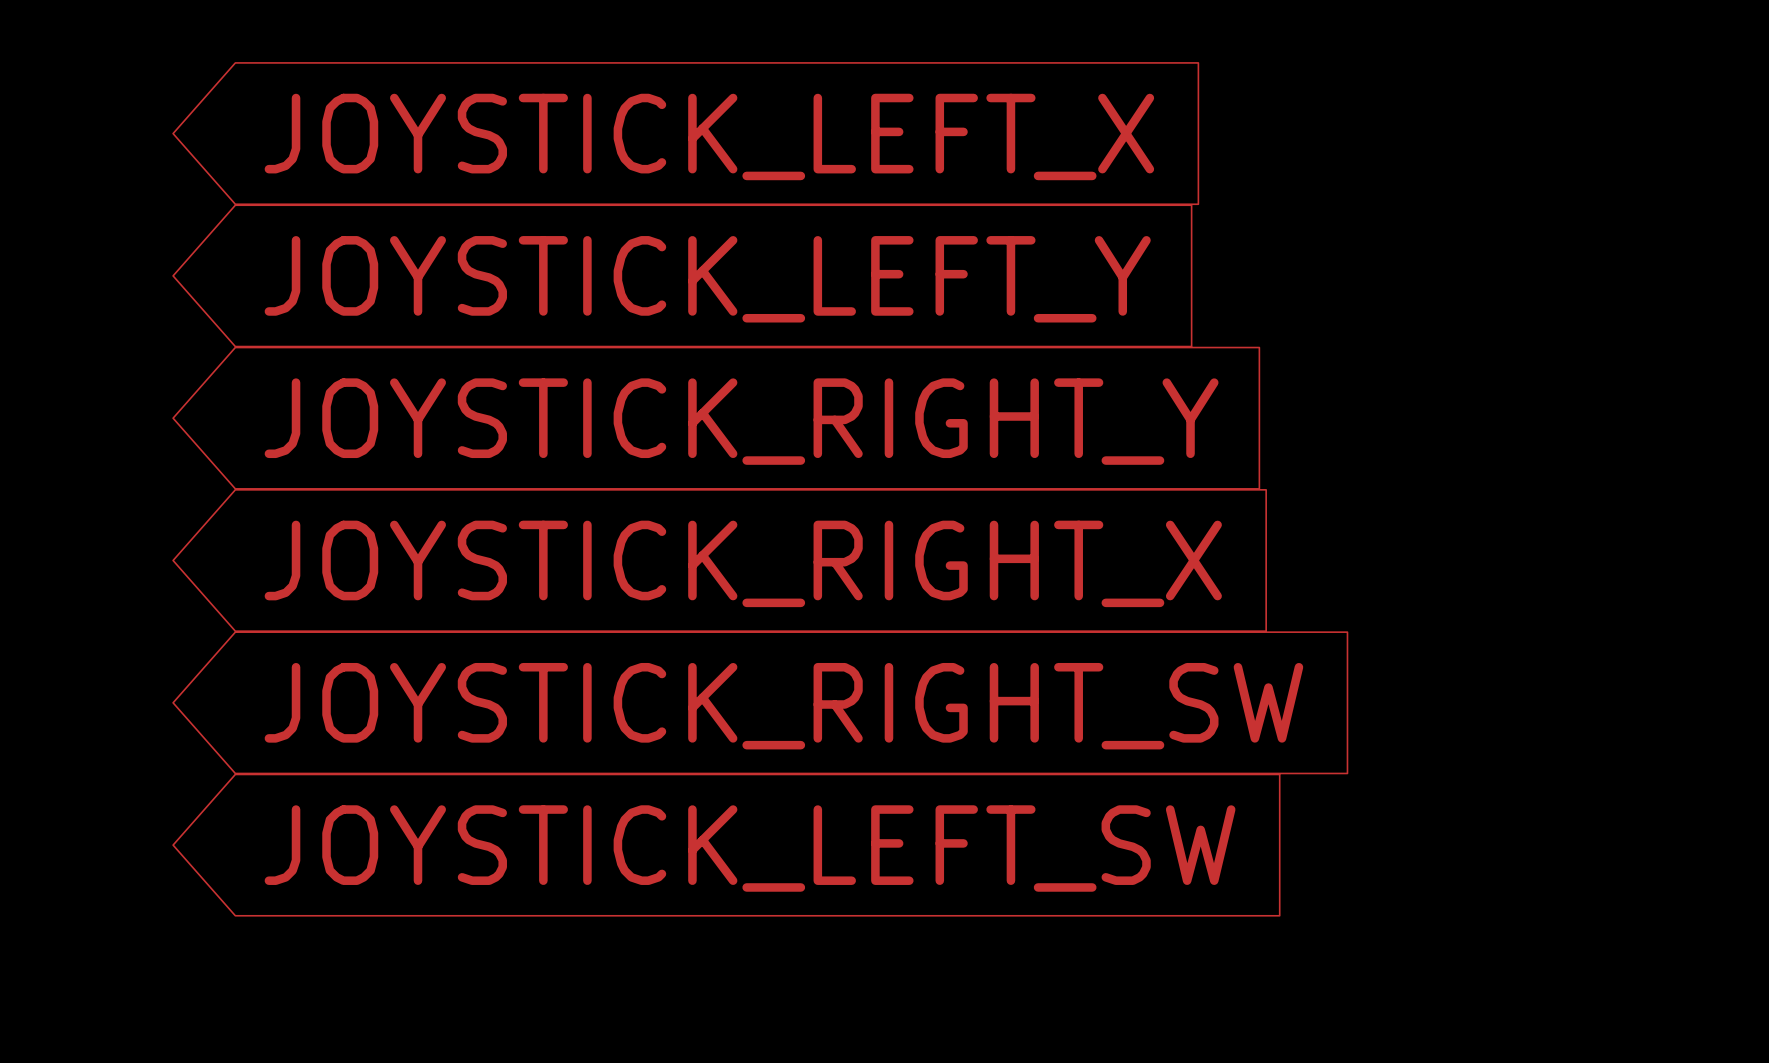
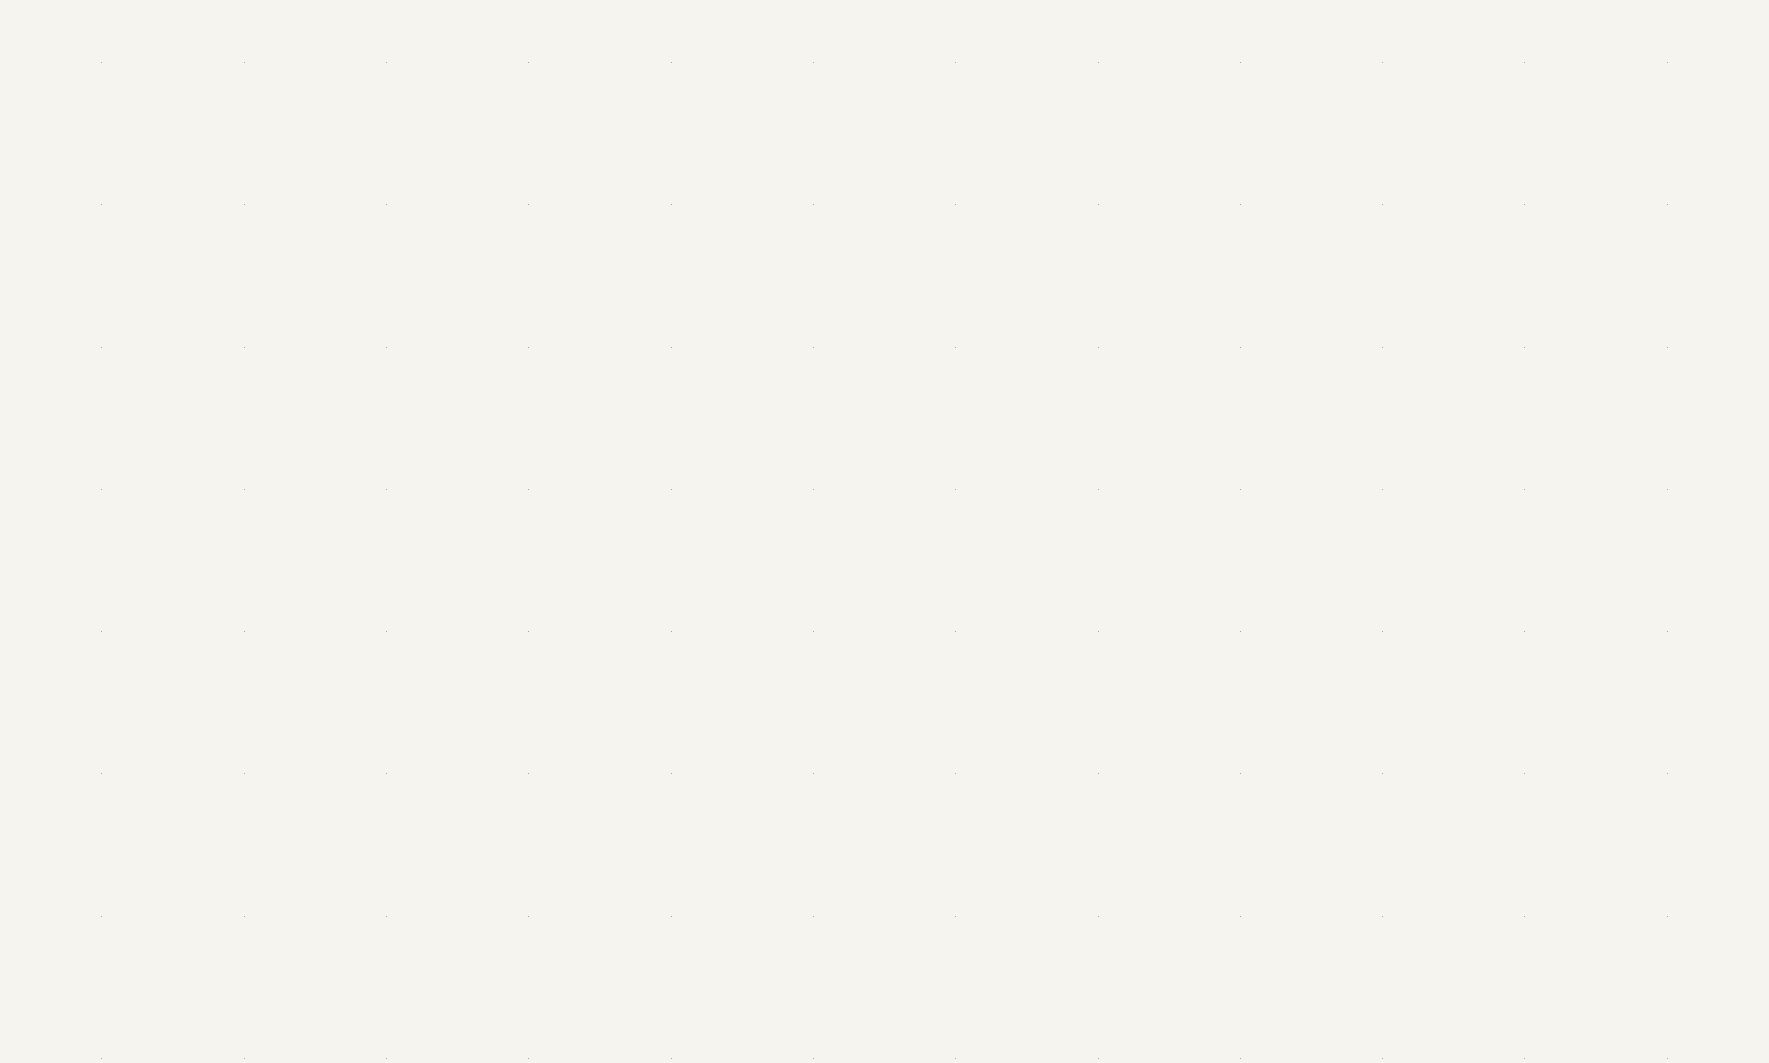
global label: JOYSTICK_LEFT_X (709, 136) -> none
global label: JOYSTICK_LEFT_Y (707, 279) -> none
global label: JOYSTICK_RIGHT_Y (741, 421) -> none
global label: JOYSTICK_RIGHT_X (743, 563) -> none
global label: JOYSTICK_RIGHT_SW (783, 706) -> none
global label: JOYSTICK_LEFT_SW (750, 848) -> none

